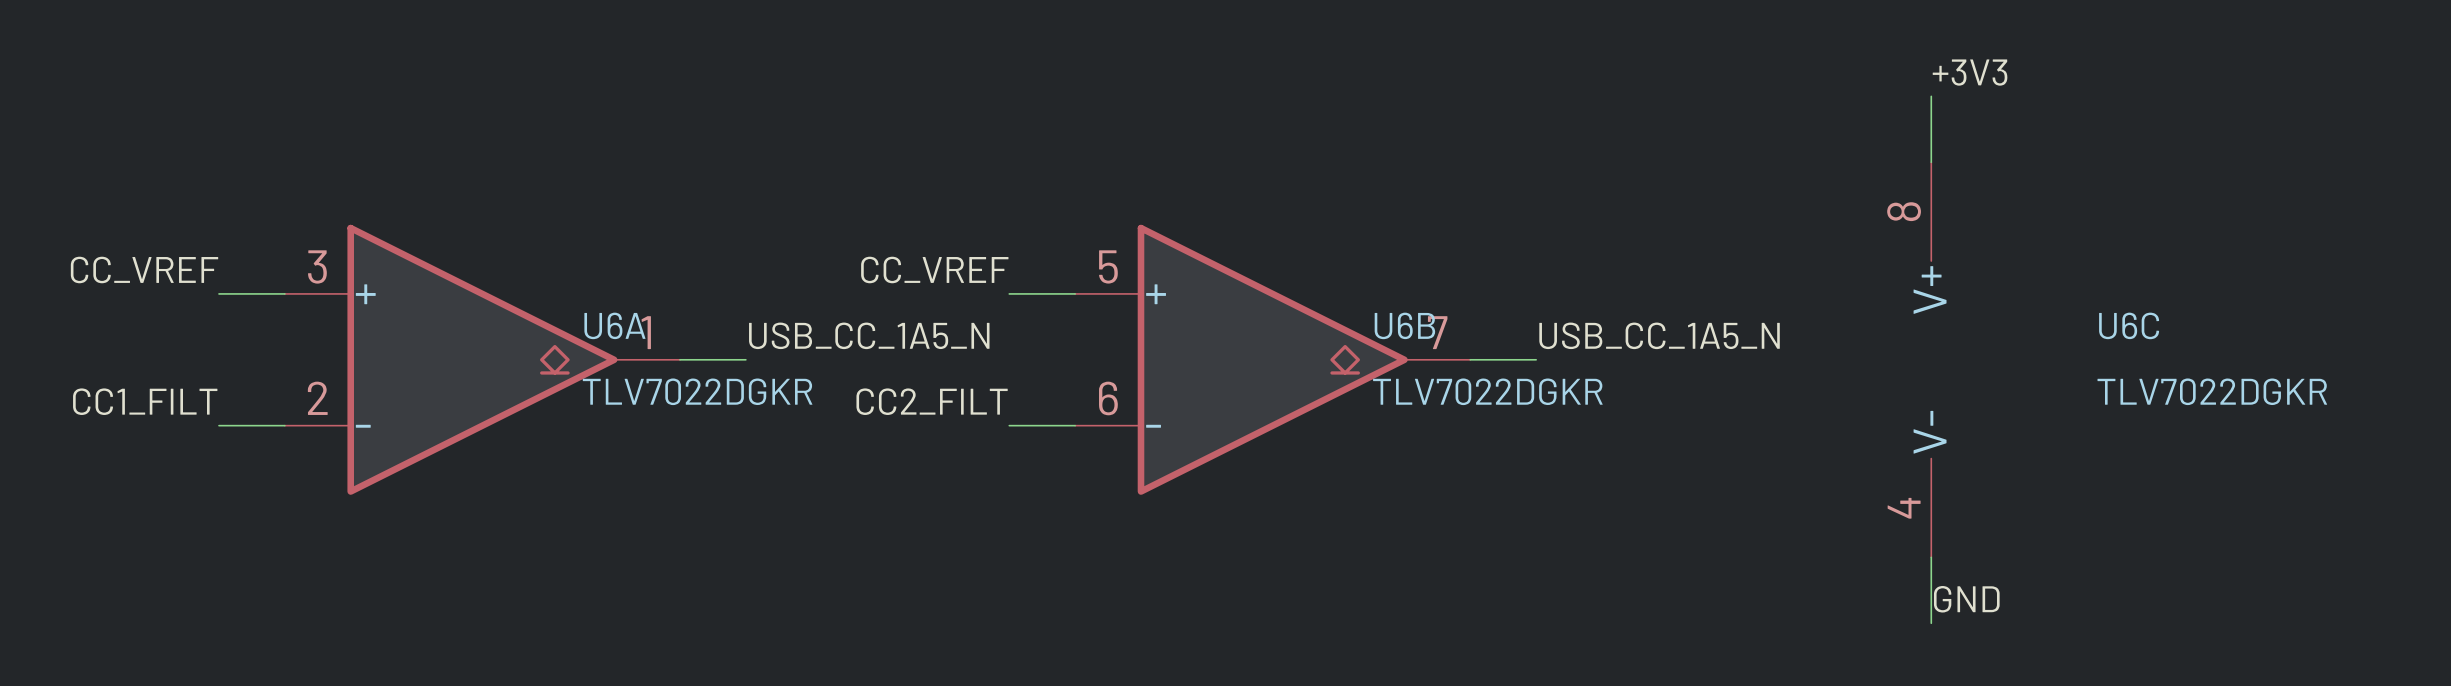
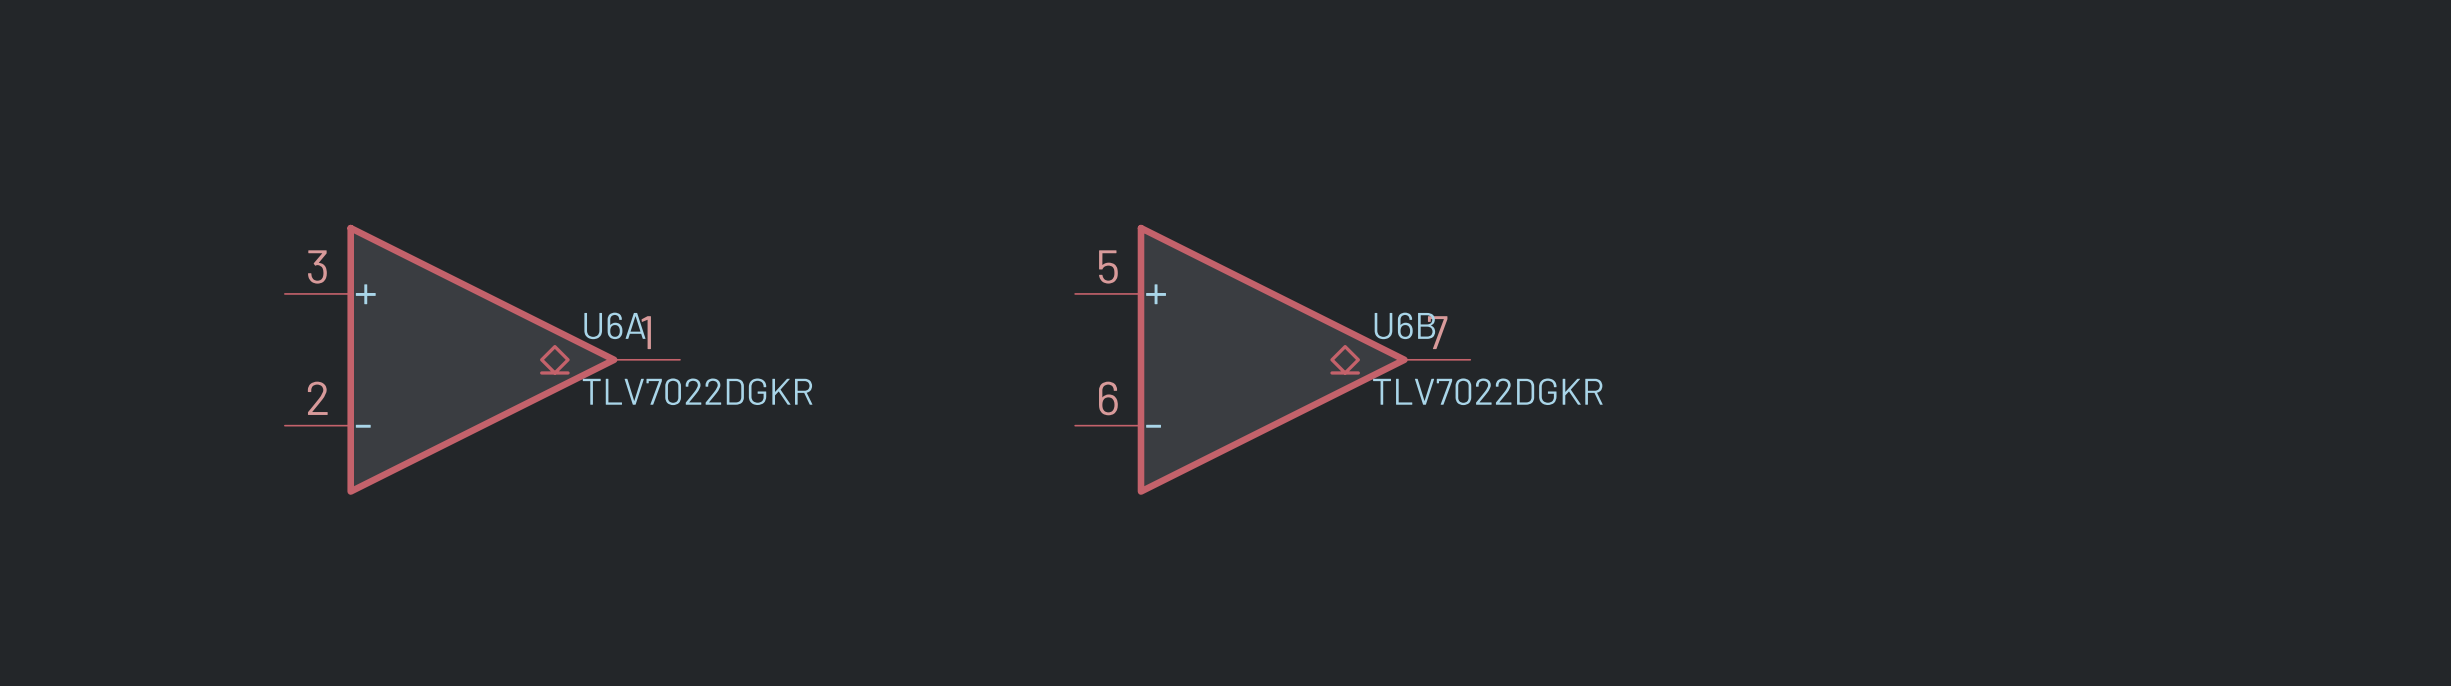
label: +3V3 (1970, 72) -> none
wire: (1931, 96) (1931, 162) -> none
label: CC_VREF (144, 269) -> none
label: CC_VREF (934, 269) -> none
wire: (219, 293) (284, 293) -> none
wire: (1009, 293) (1075, 293) -> none
label: USB_CC_1A5_N (869, 335) -> none
label: USB_CC_1A5_N (1659, 335) -> none
wire: (680, 359) (745, 359) -> none
wire: (1470, 359) (1536, 359) -> none
U6C: TLV7022DGKR (1931, 359) -> none
label: CC1_FILT (145, 401) -> none
label: CC2_FILT (932, 401) -> none
wire: (219, 425) (284, 425) -> none
wire: (1009, 425) (1075, 425) -> none
wire: (1931, 557) (1931, 623) -> none
label: GND (1966, 599) -> none

